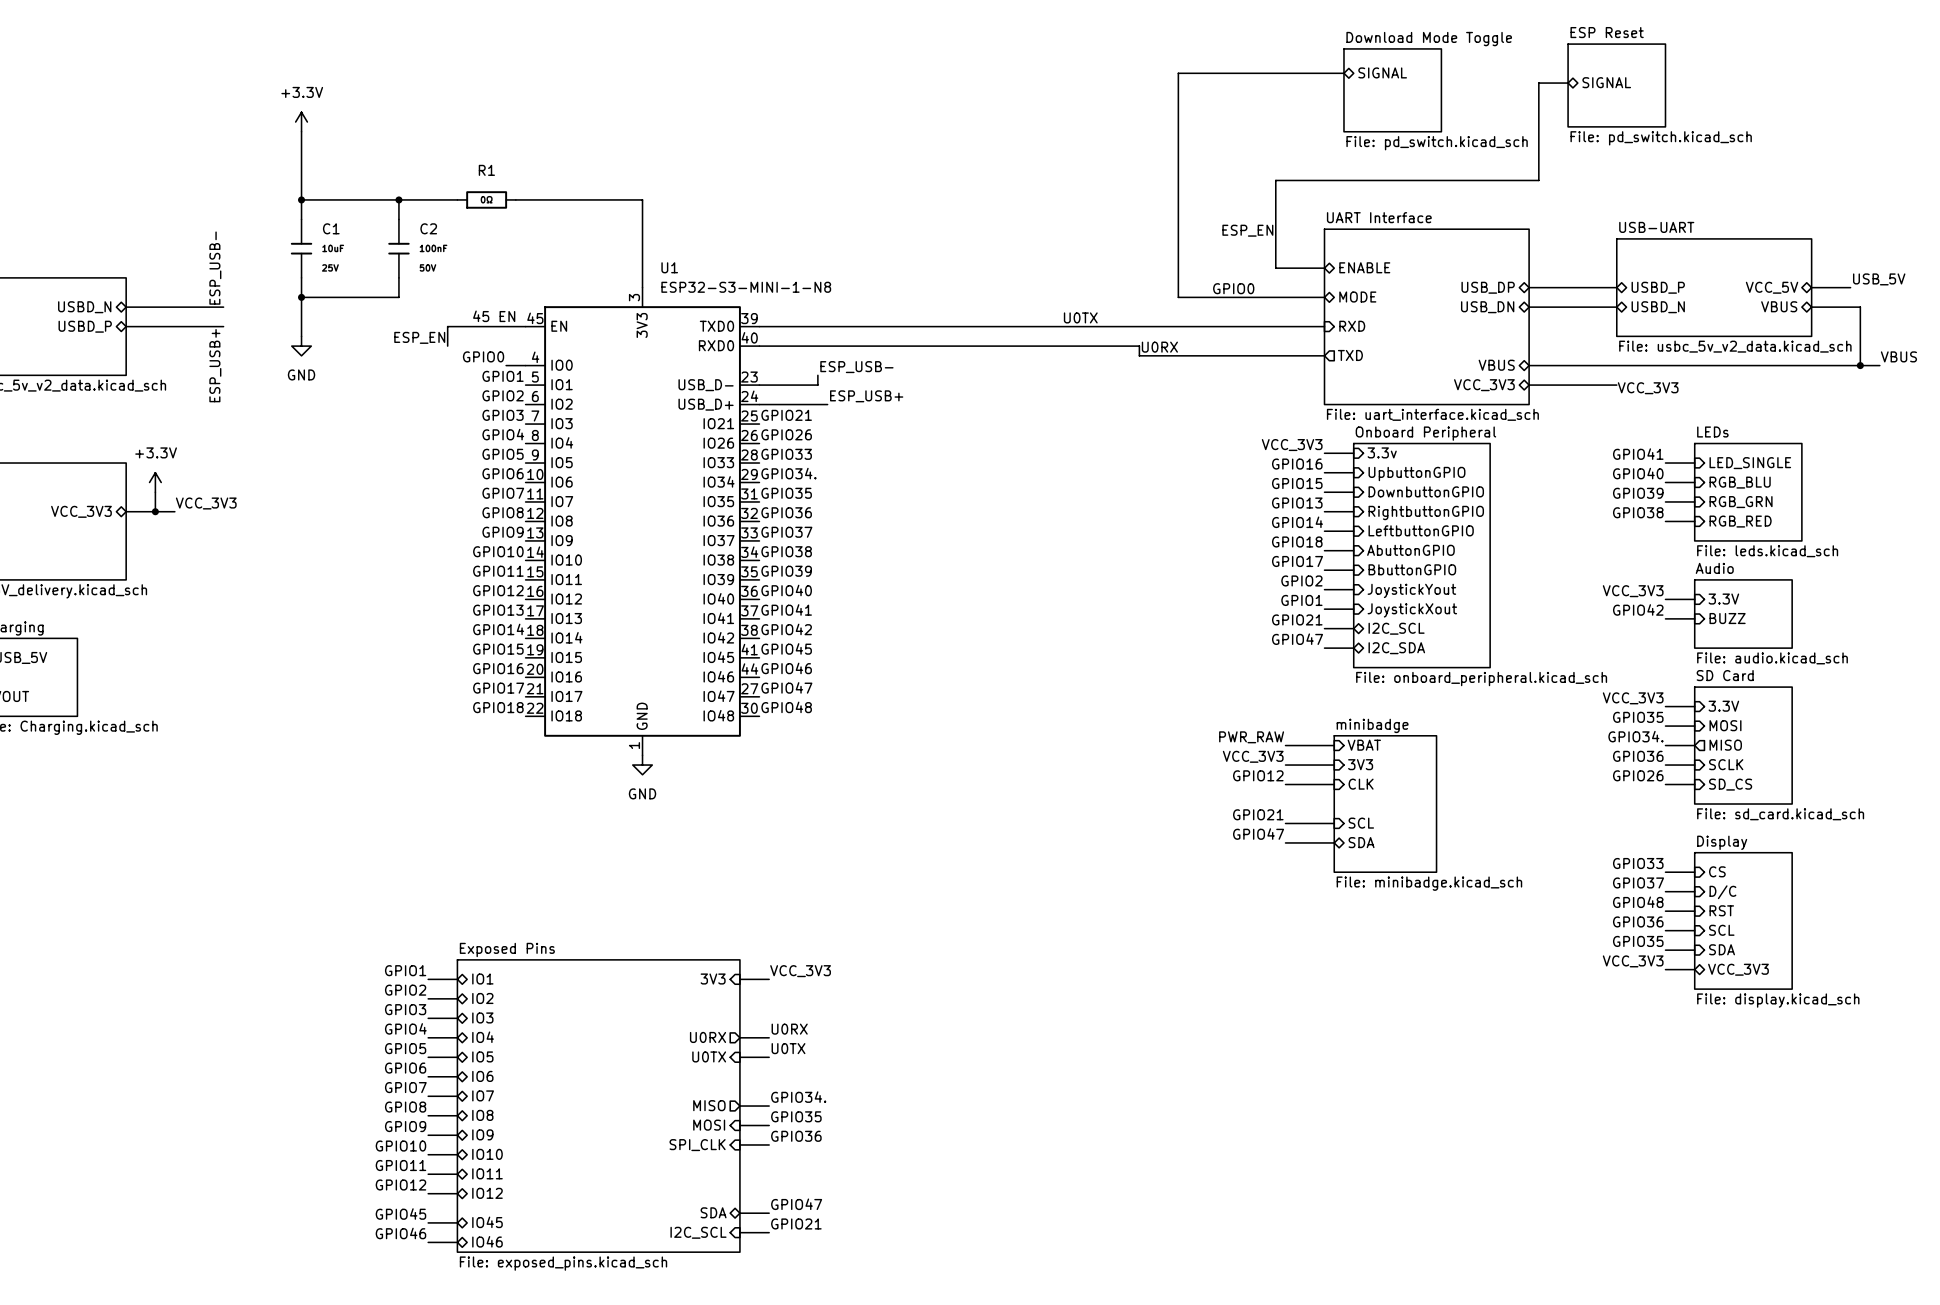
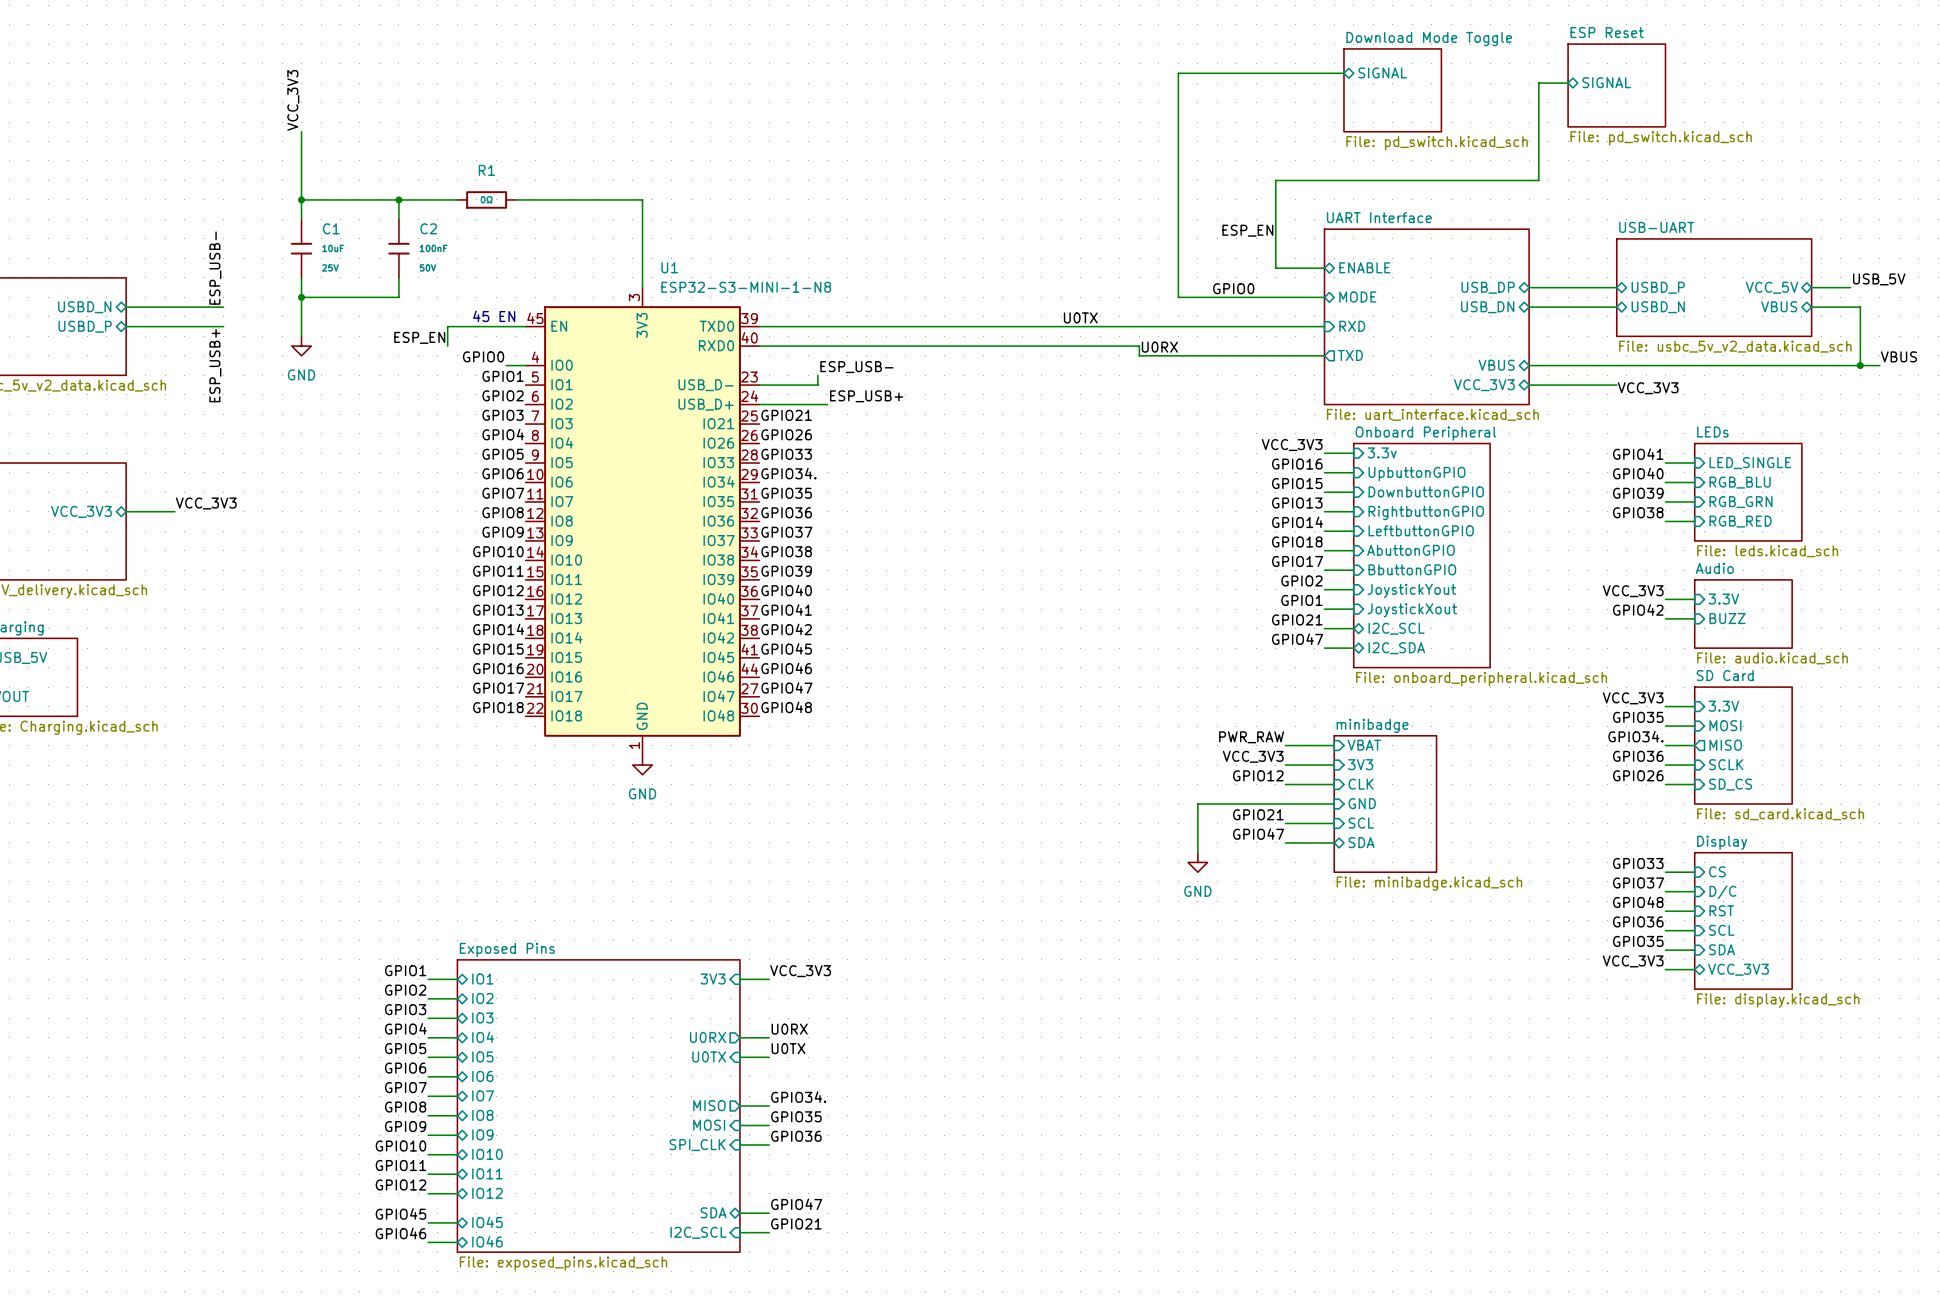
label: none -> VCC_3V3 (293, 100)
power symbol: +3.3V (301, 122) -> none
power symbol: +3.3V (155, 482) -> none
wire: (155, 492) (155, 511) -> none
junction: (155, 511) -> none
sheet pin: none -> GND (1362, 803)
wire: none -> (1334, 804) (1197, 804) (1197, 852)
power symbol: none -> GND (1197, 862)

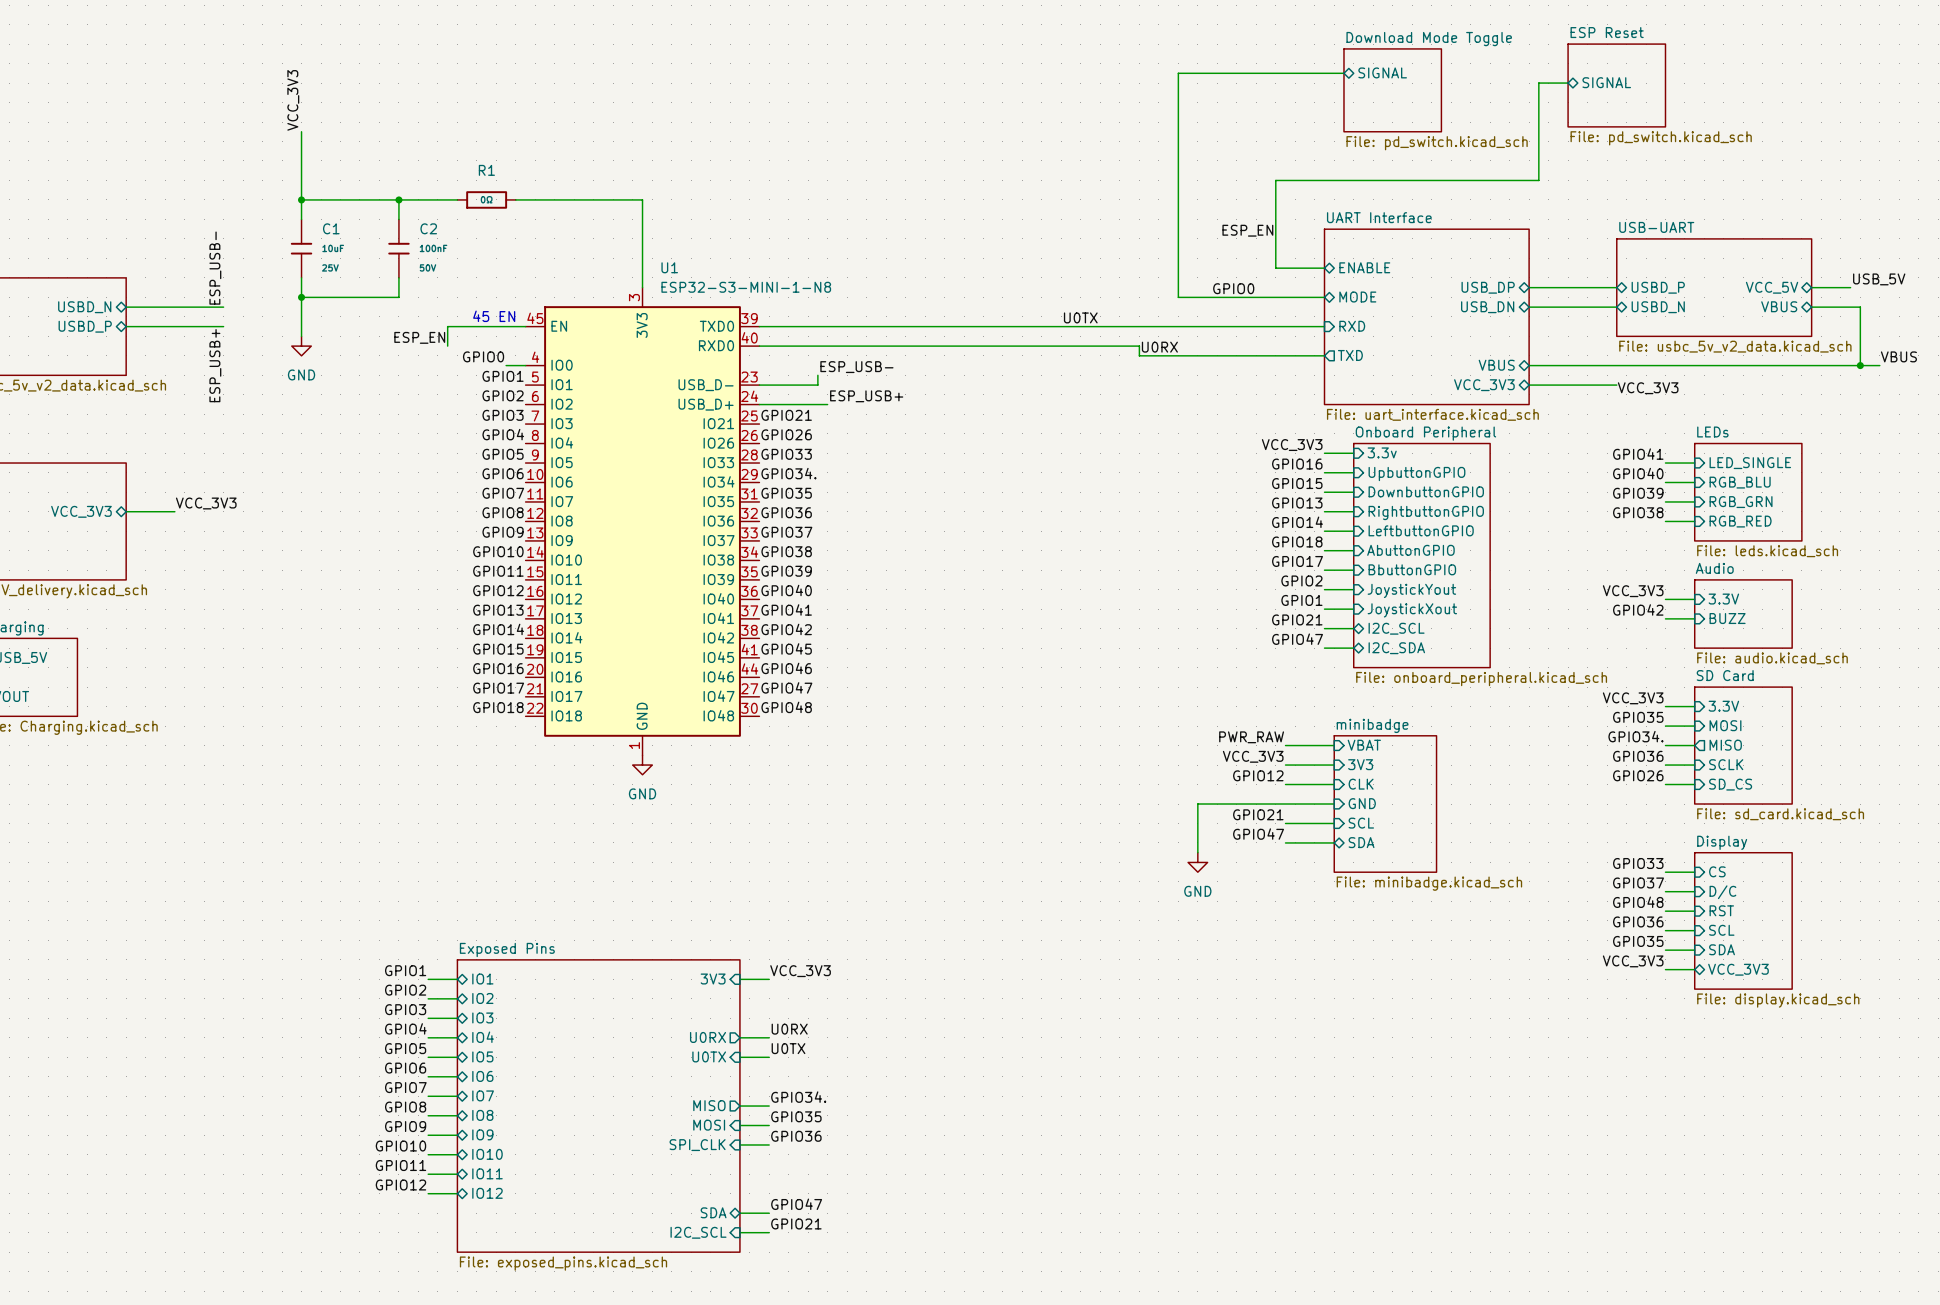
label: GPIO45 (400, 1214) -> none
wire: (428, 1222) (457, 1222) -> none
sheet pin: IO45 (487, 1222) -> none
label: GPIO46 (400, 1233) -> none
sheet pin: IO46 (487, 1241) -> none
wire: (428, 1242) (457, 1242) -> none

